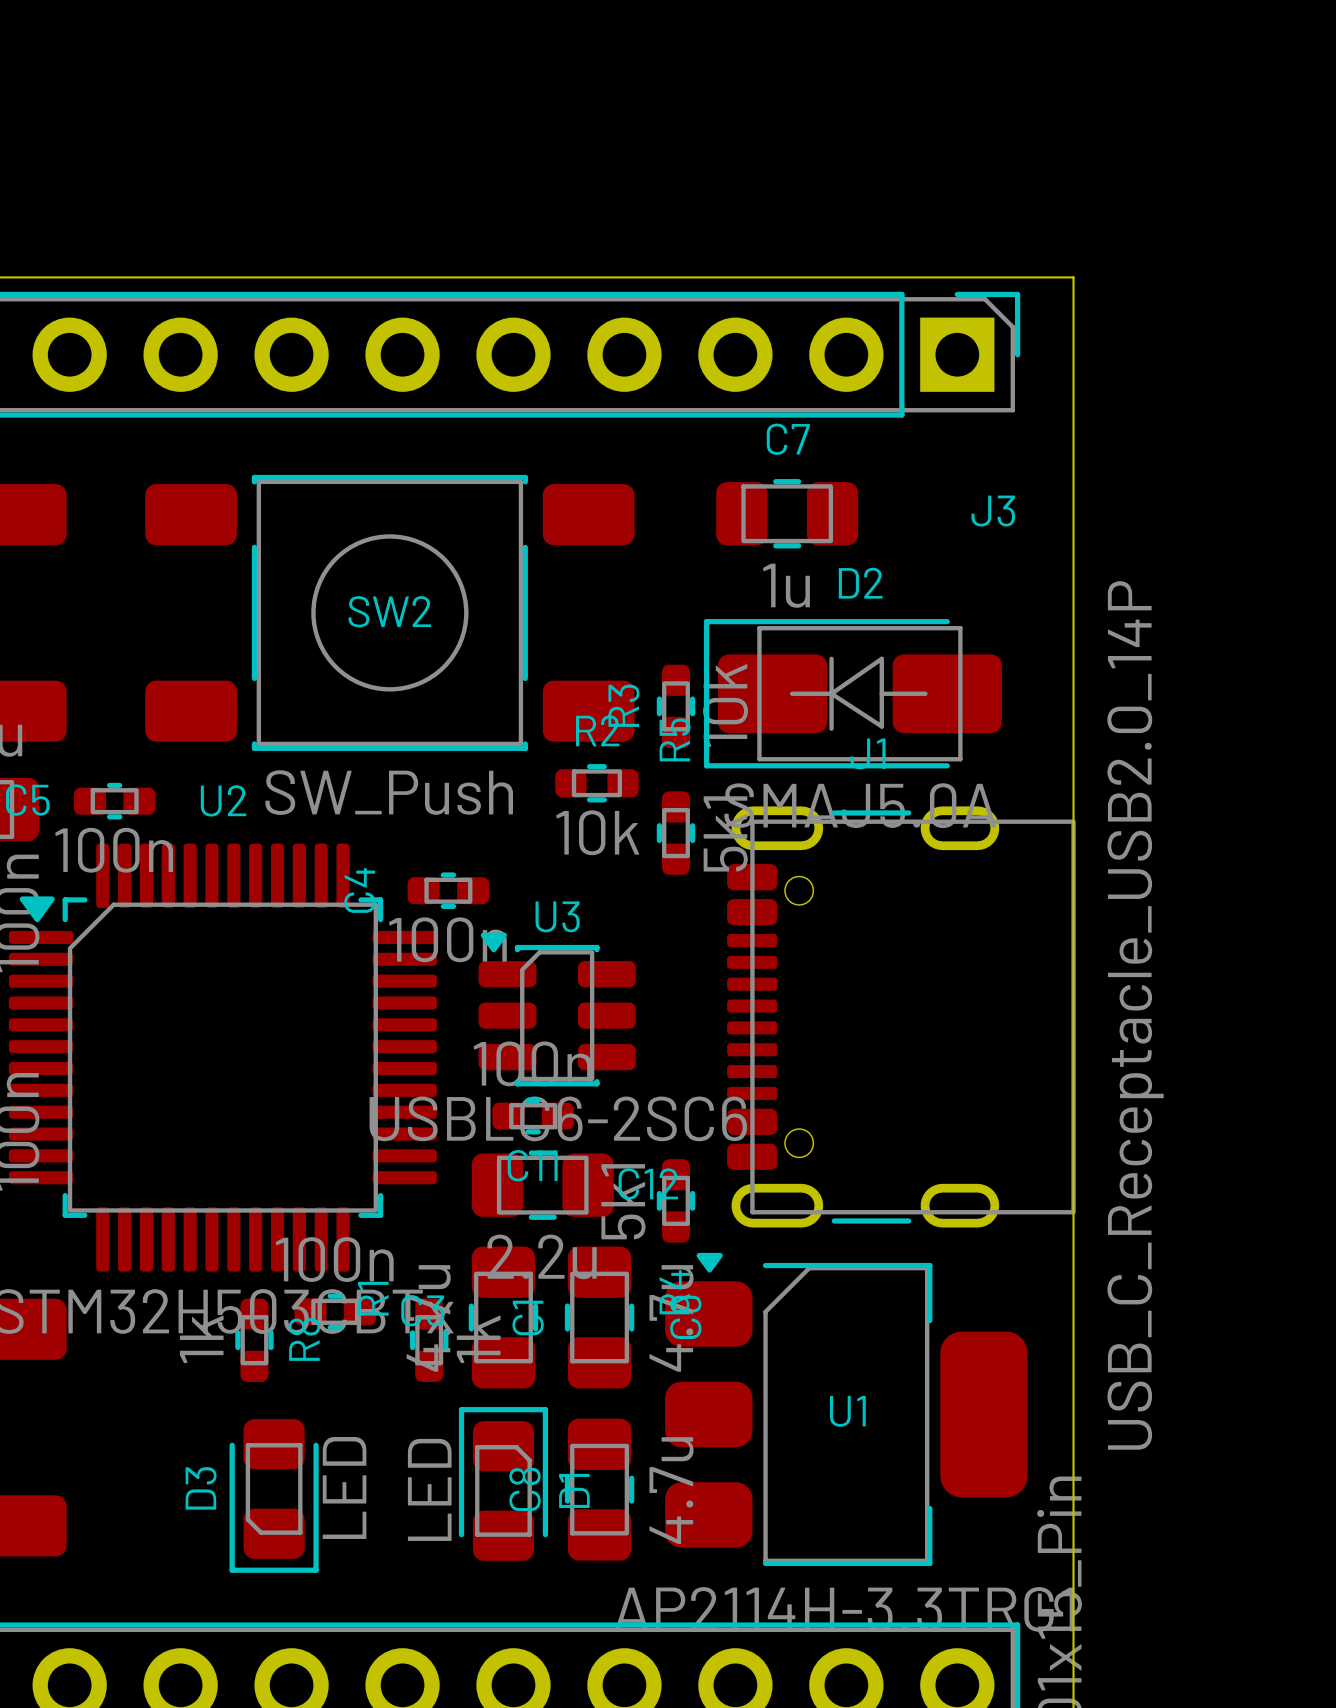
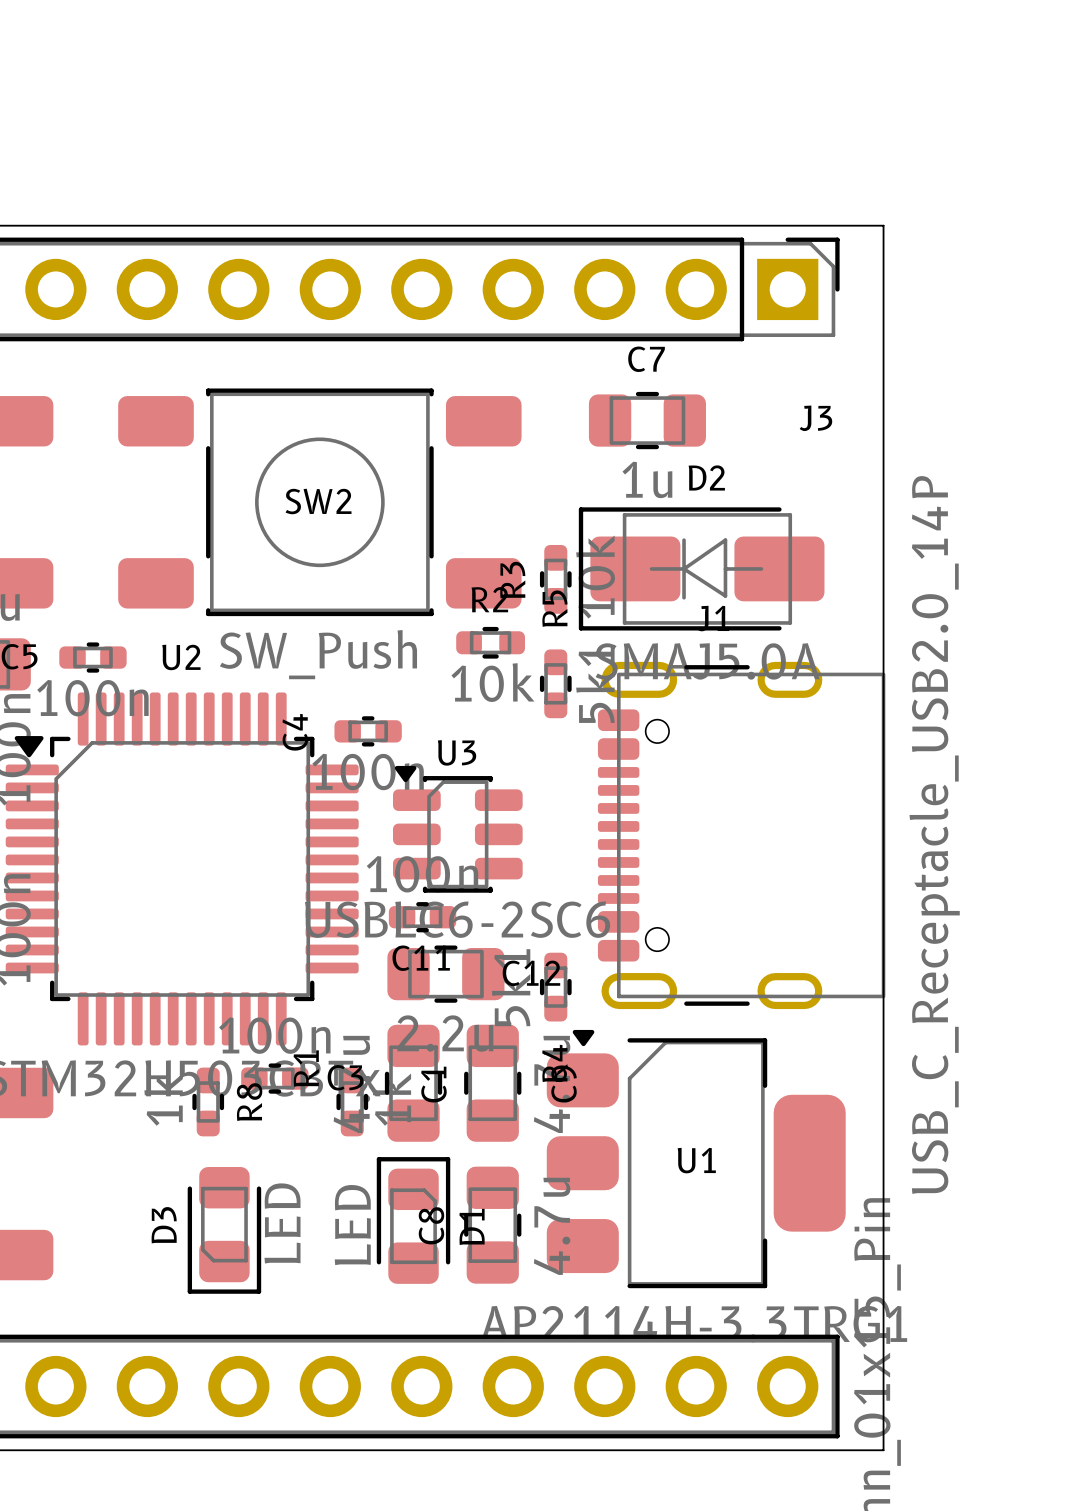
C11 position: (533, 1116) -> (422, 917)

